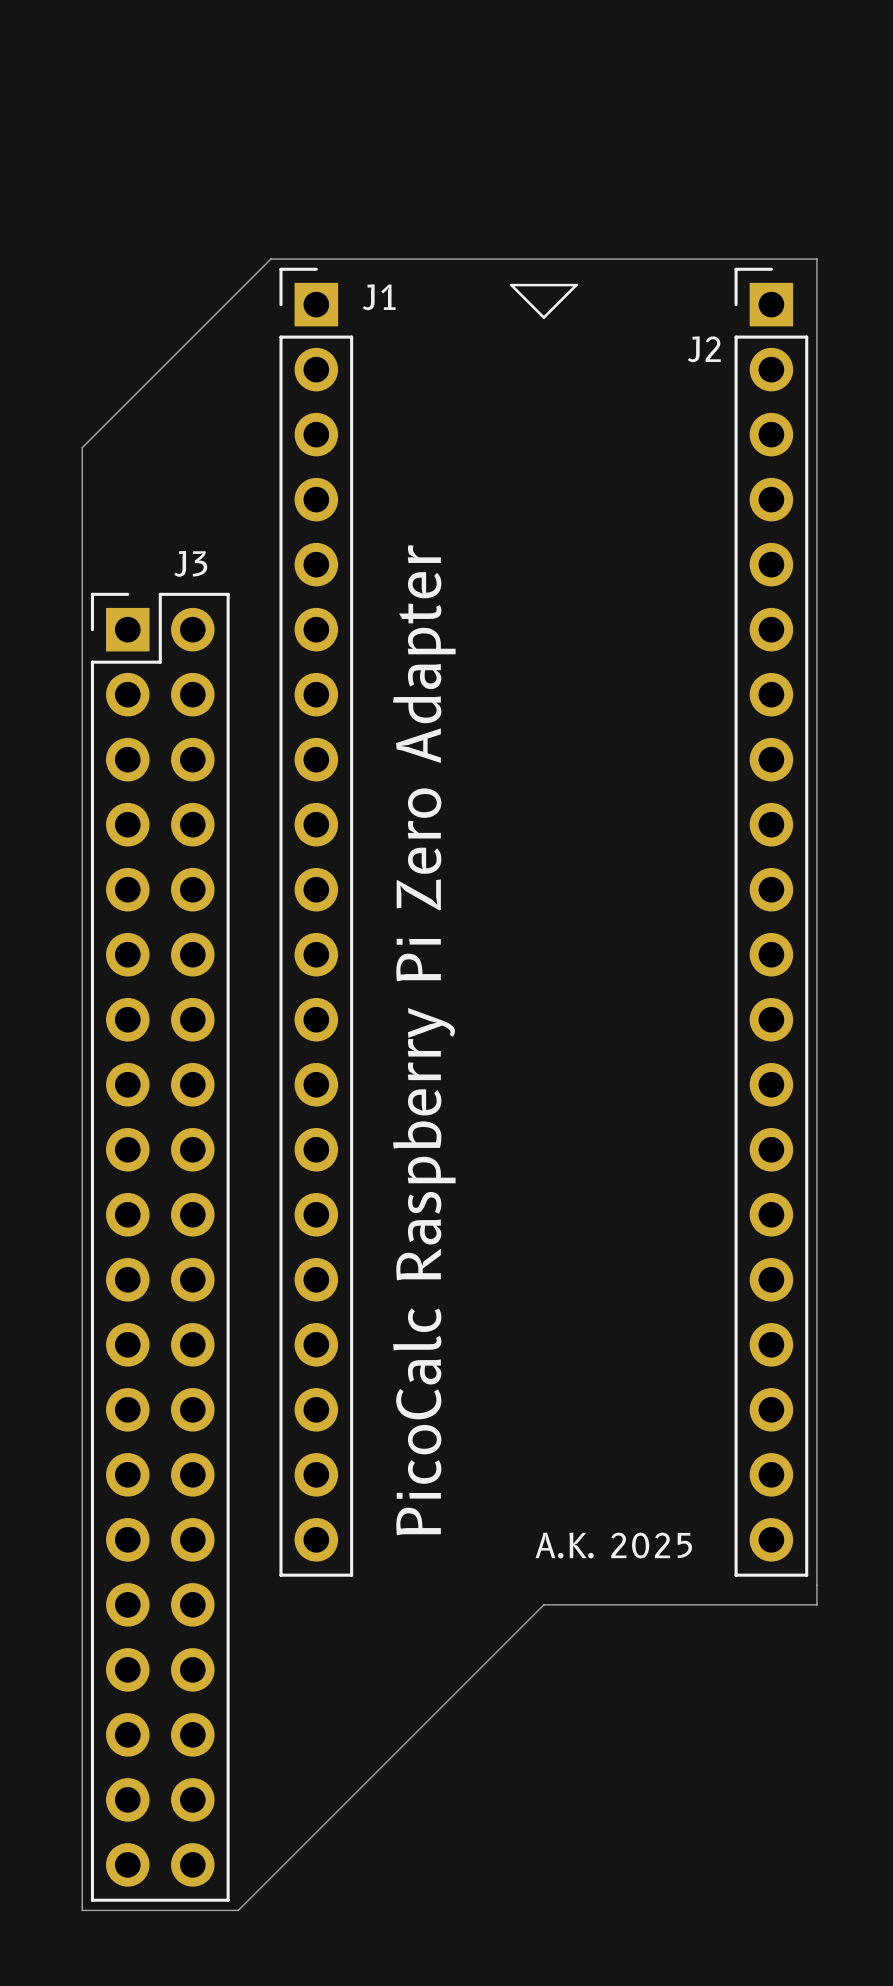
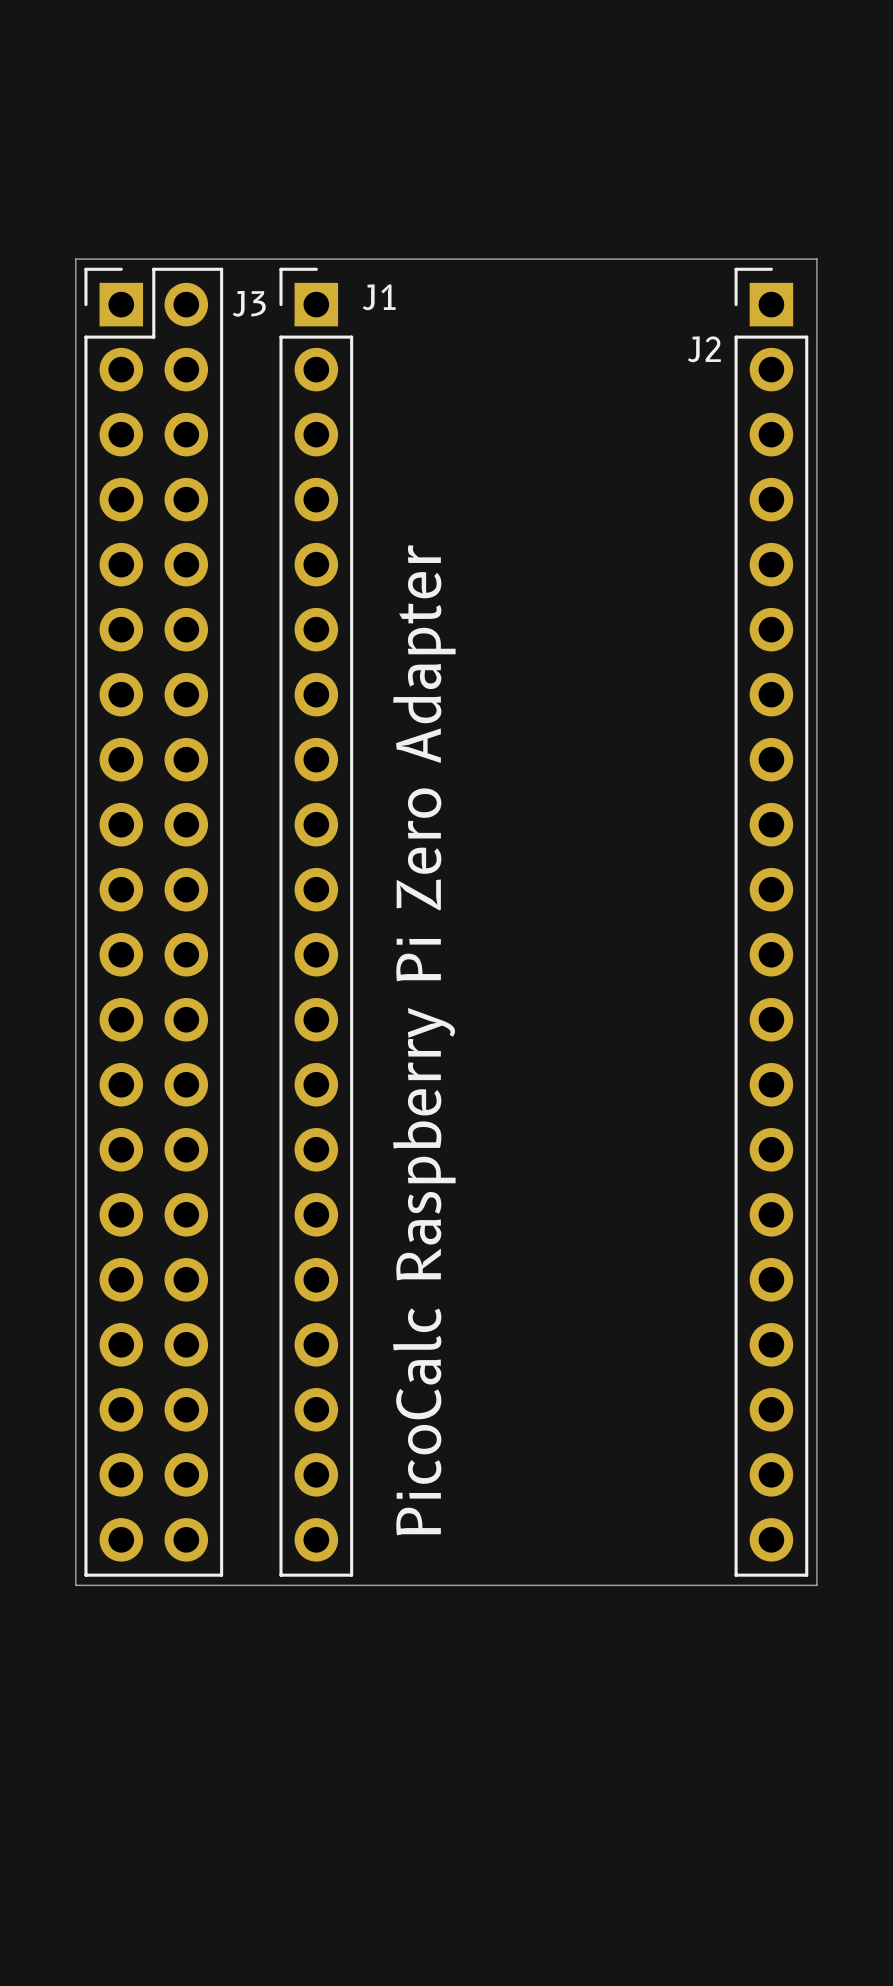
board edge: (270, 259) (82, 447) (82, 1910) (238, 1910) (543, 1604) (816, 1604) (816, 1585) -> (270, 259) (75, 259) (75, 1585) (816, 1585)
line: (511, 285) (543, 317) (576, 285) (511, 285) -> none
J3 name position: J3 (190, 563) -> J3 (249, 303)
J3 position: (160, 1247) -> (153, 922)
text: A.K. 2025 (613, 1545) -> none

